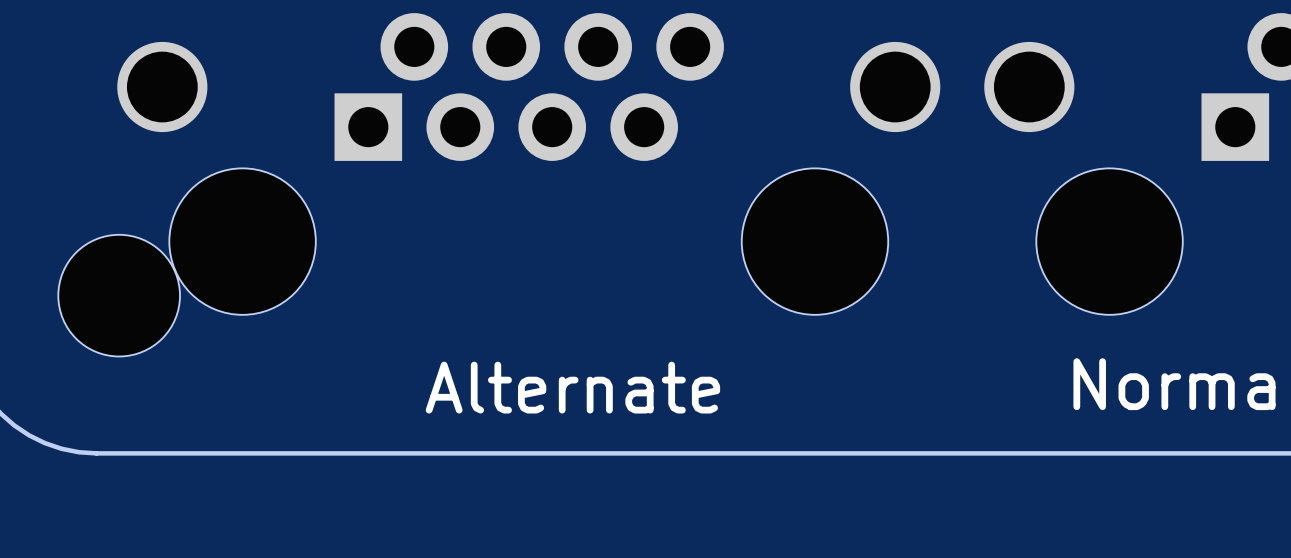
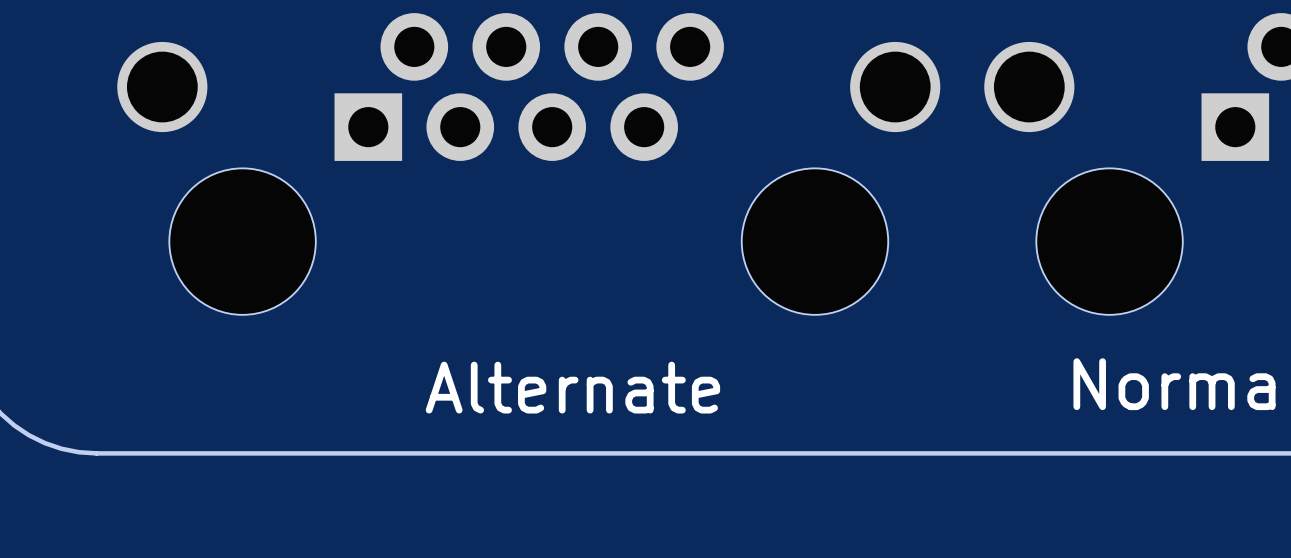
part: (119, 295) -> none

